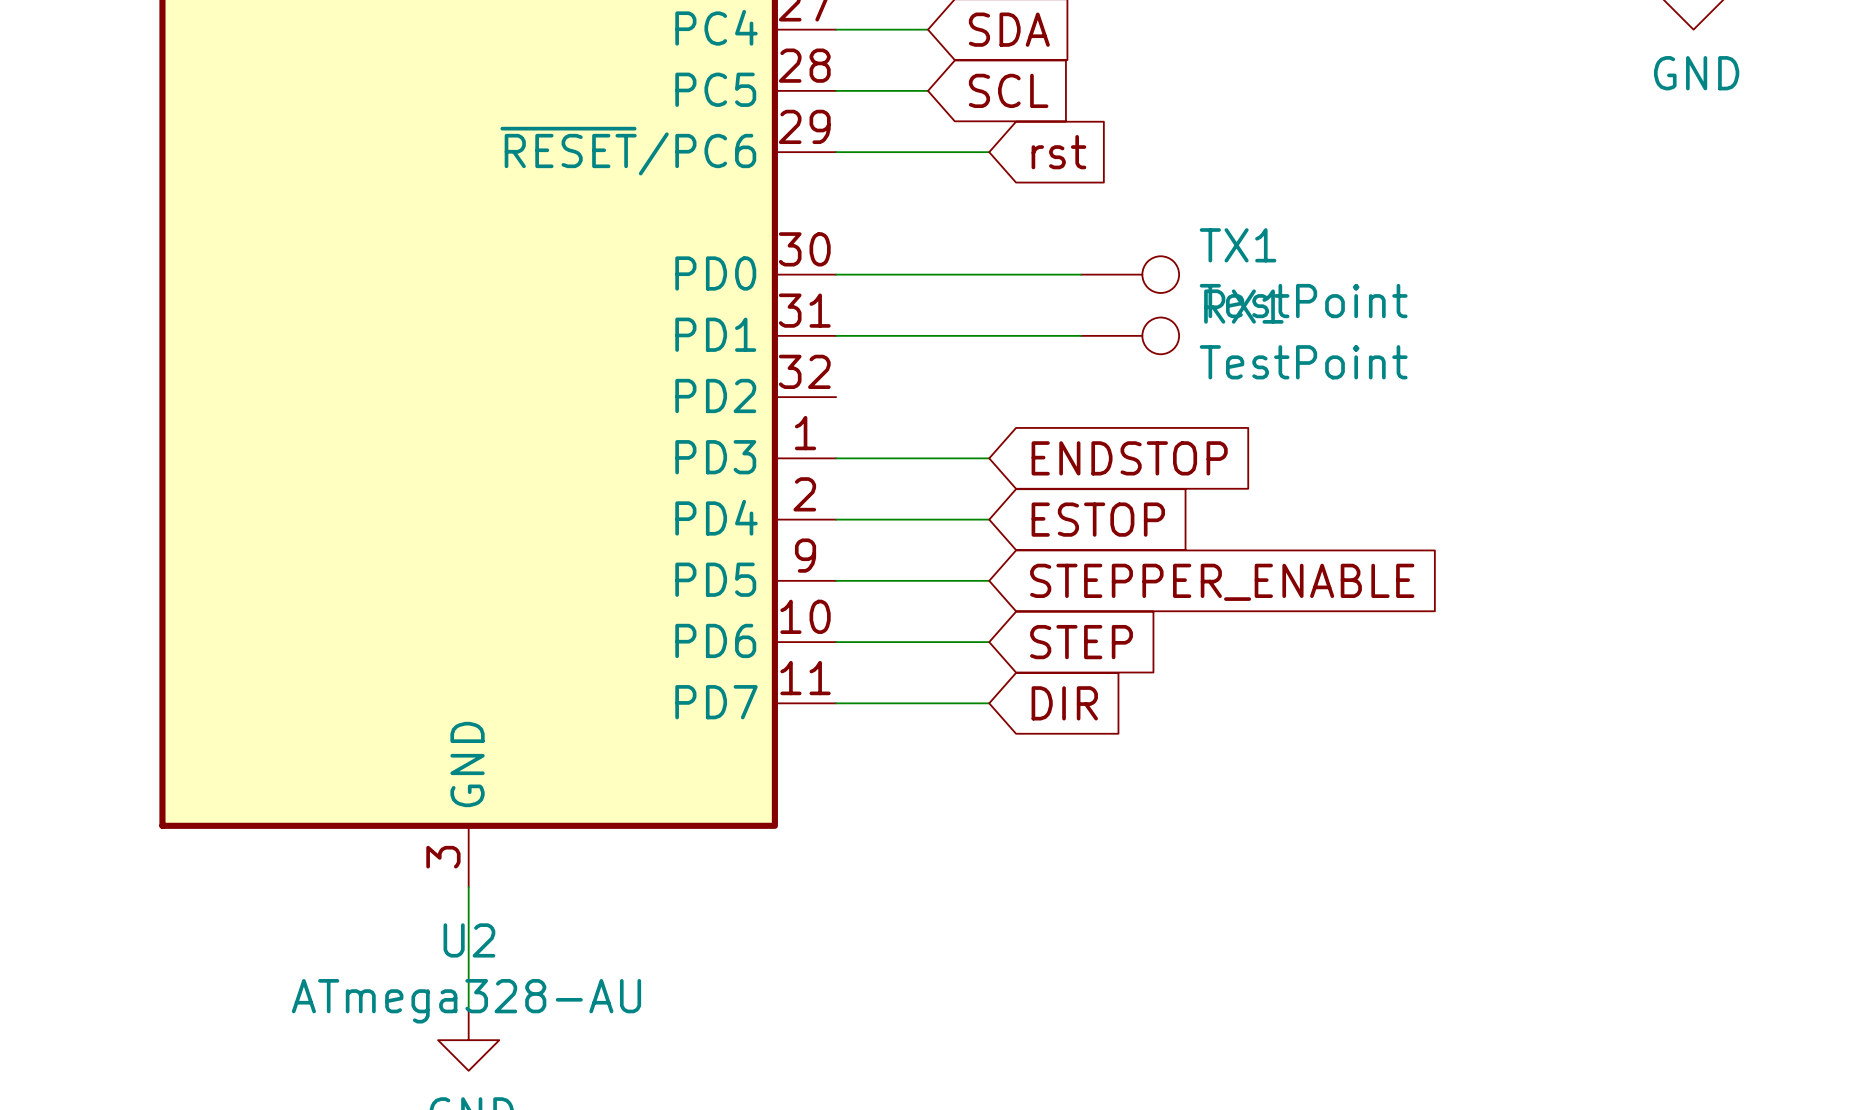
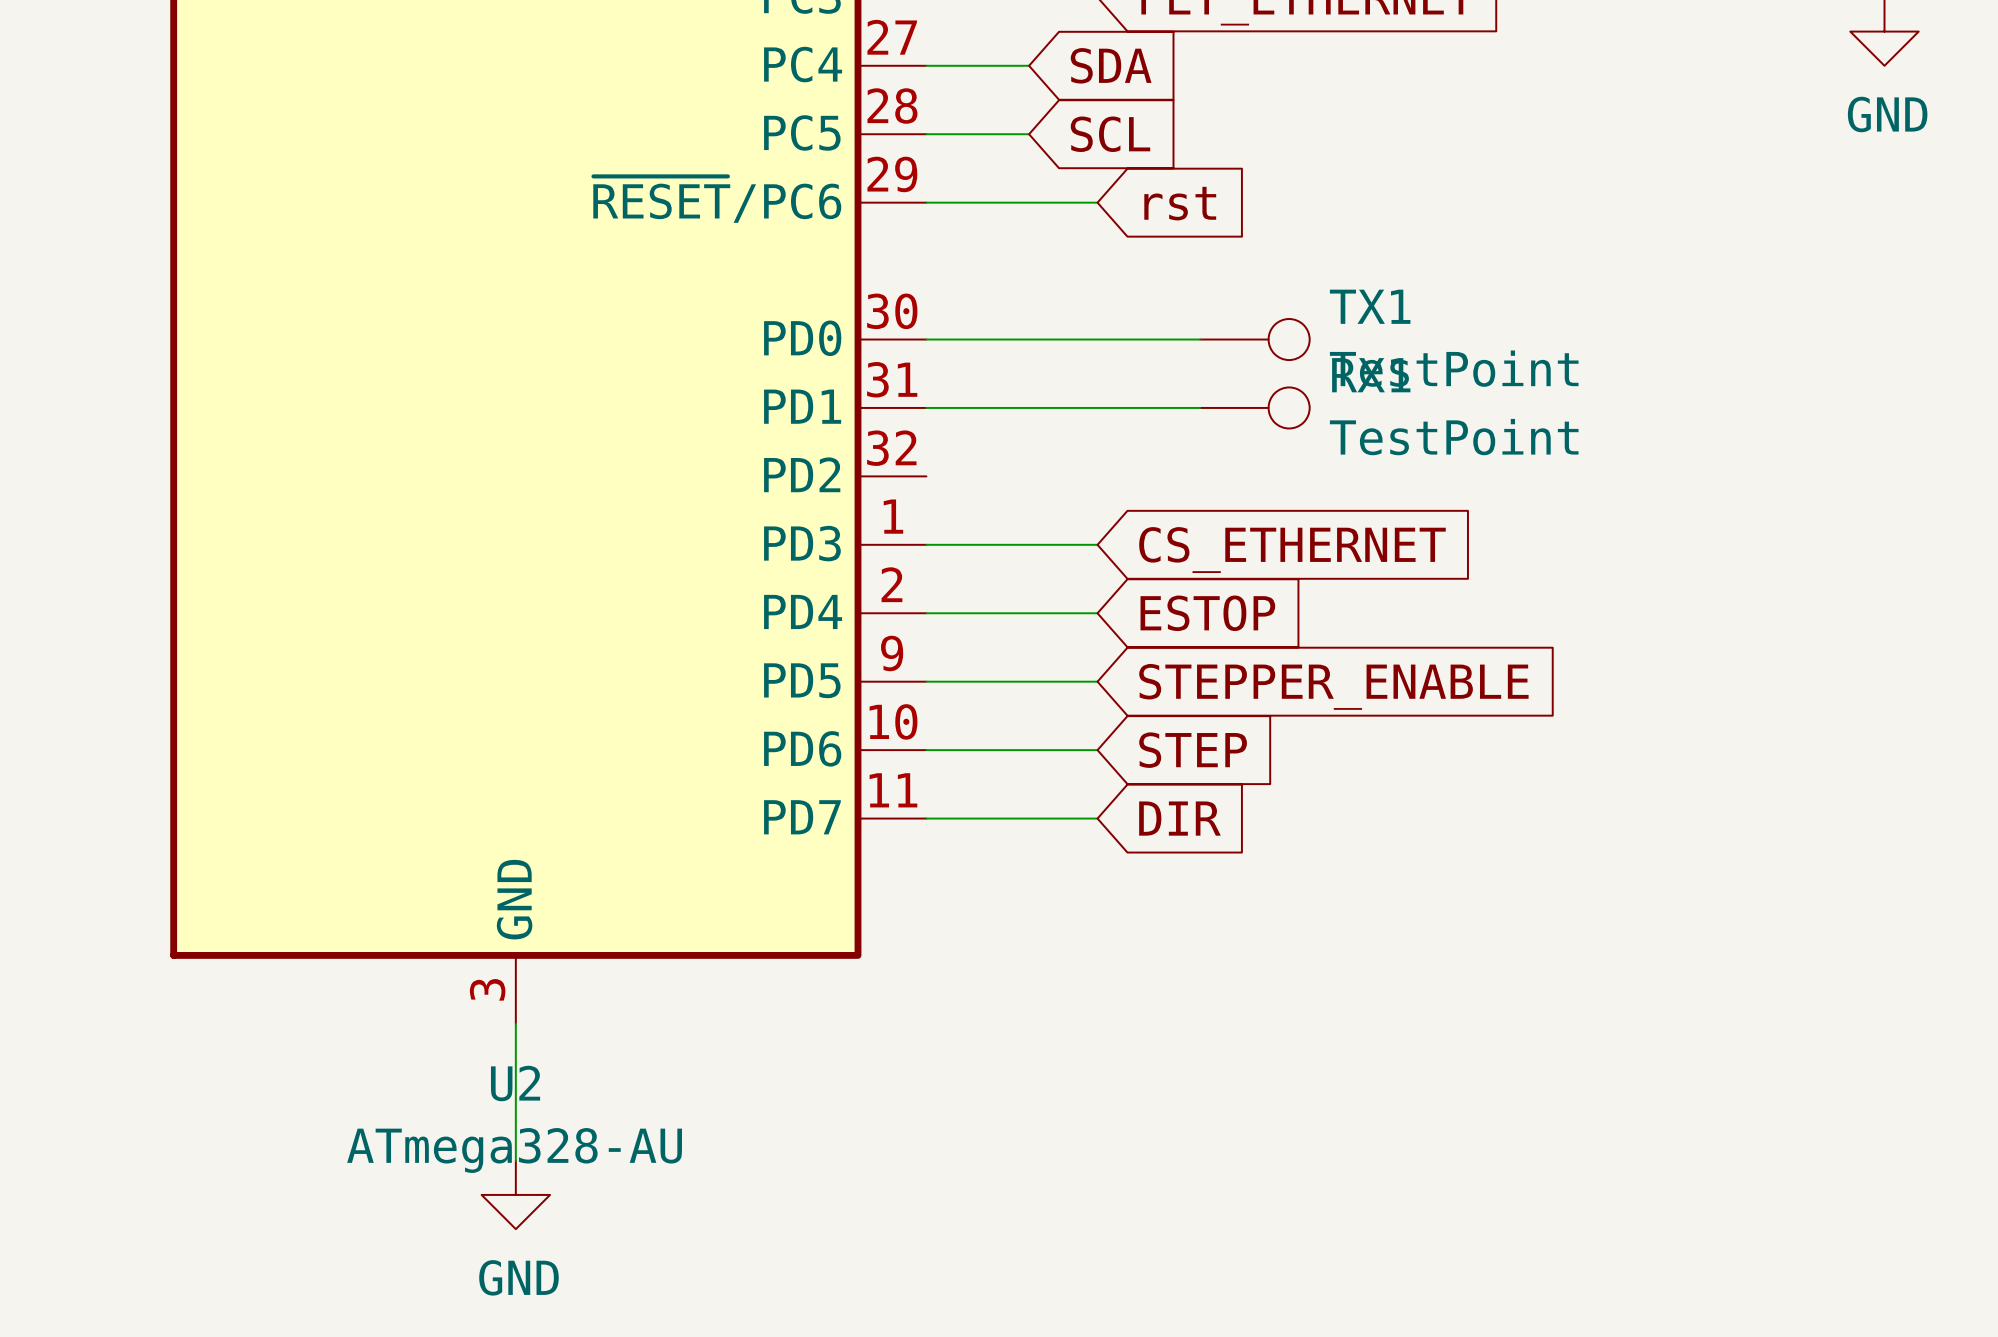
global label: ENDSTOP (1129, 458) -> CS_ETHERNET (1292, 550)

